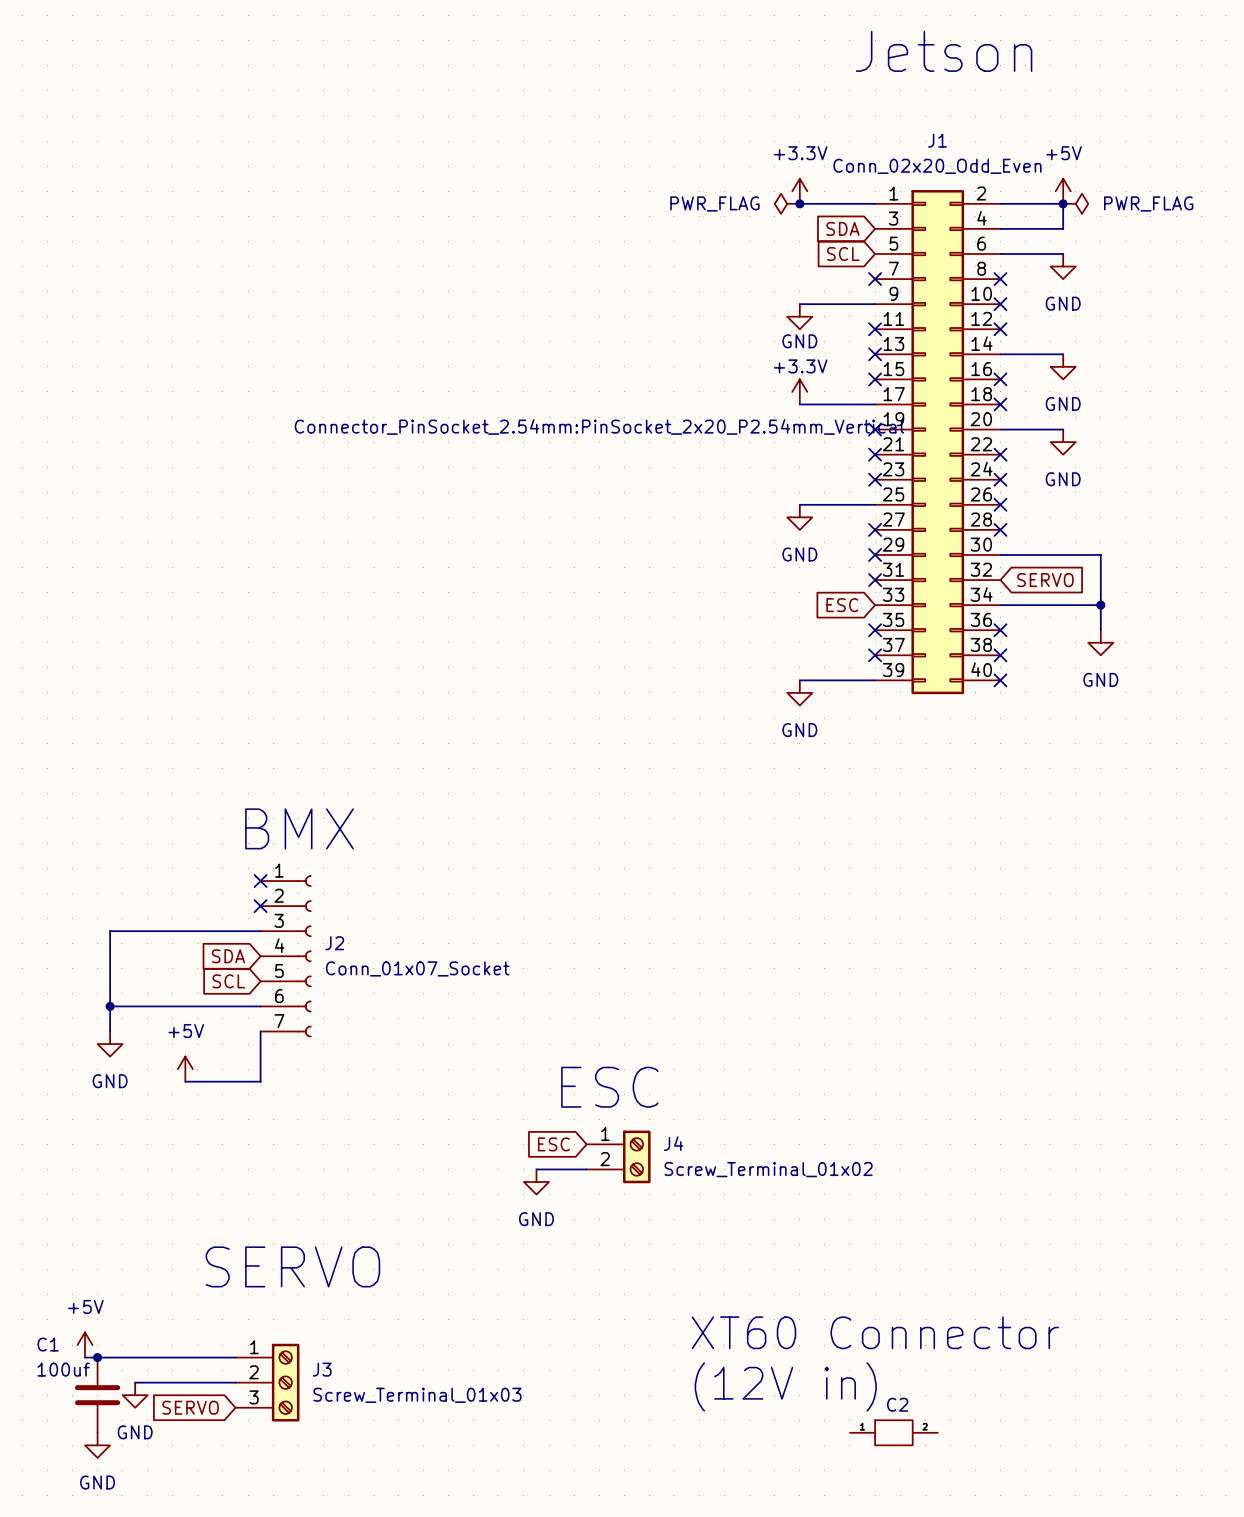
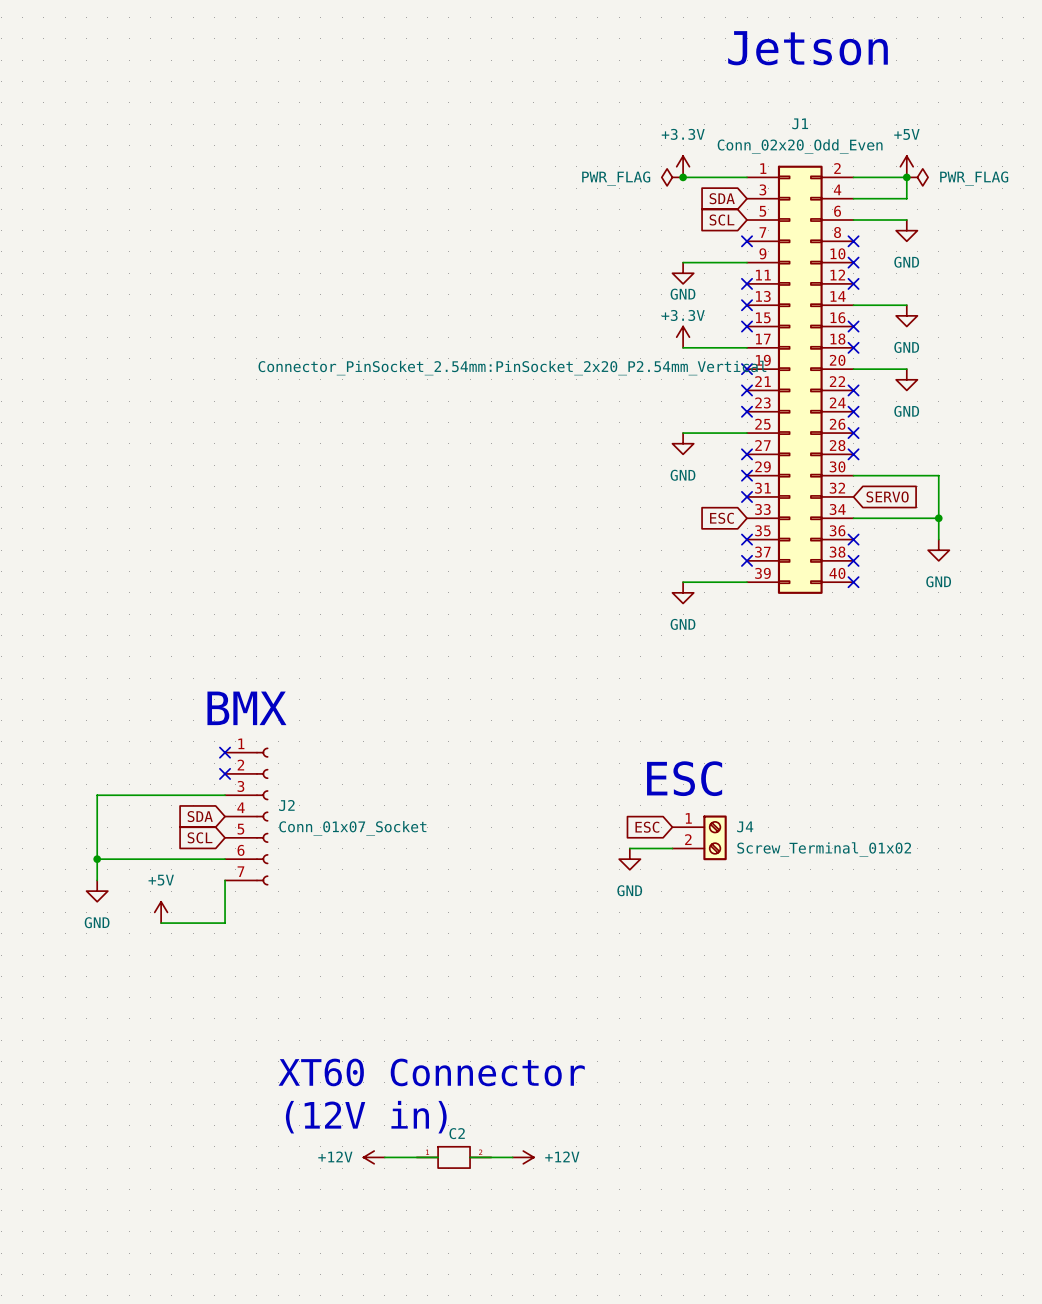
text: none -> ESC (684, 778)
global label: none -> ESC (647, 827)
wire: none -> (629, 848) (672, 848)
power symbol: none -> GND (629, 859)
text: ESC (609, 1087) -> none
global label: ESC (553, 1144) -> none
J4 position: (618, 1156) -> (699, 837)
wire: (536, 1169) (586, 1169) -> (470, 1157) (512, 1157)
power symbol: GND (536, 1182) -> none
text: none -> XT60 Connector (431, 1072)
text: SERVO (292, 1266) -> none
text: none -> (12V in) (366, 1117)
text: XT60 Connector (875, 1332) -> none
power symbol: +5V (85, 1345) -> none
wire: (85, 1357) (235, 1357) -> none
junction: (97, 1357) -> none
power symbol: none -> +12V (374, 1157)
wire: none -> (384, 1157) (438, 1157)
power symbol: none -> +12V (523, 1157)
wire: (135, 1382) (235, 1382) -> none
J3: Screw_Terminal_01x03 (267, 1382) -> none
text: (12V in) (785, 1386) -> none
C1: 100uf (97, 1395) -> none
power symbol: GND (135, 1395) -> none
global label: SERVO (190, 1407) -> none
C2 position: (893, 1432) -> (454, 1157)
power symbol: GND (97, 1445) -> none

